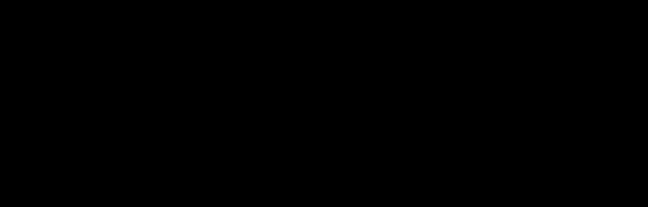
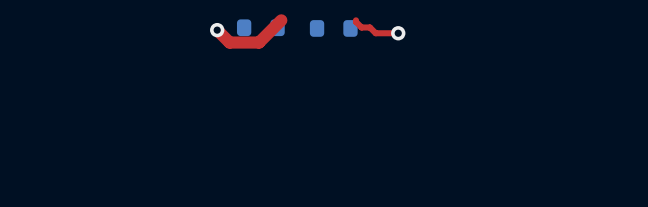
top track: none -> (281, 20) (259, 42) (229, 42) (217, 30)
top track: none -> (355, 20) (361, 27) (369, 27) (375, 33) (398, 33)
part: none -> (260, 27)
part: none -> (333, 28)
via: none -> (217, 30)
via: none -> (398, 33)

